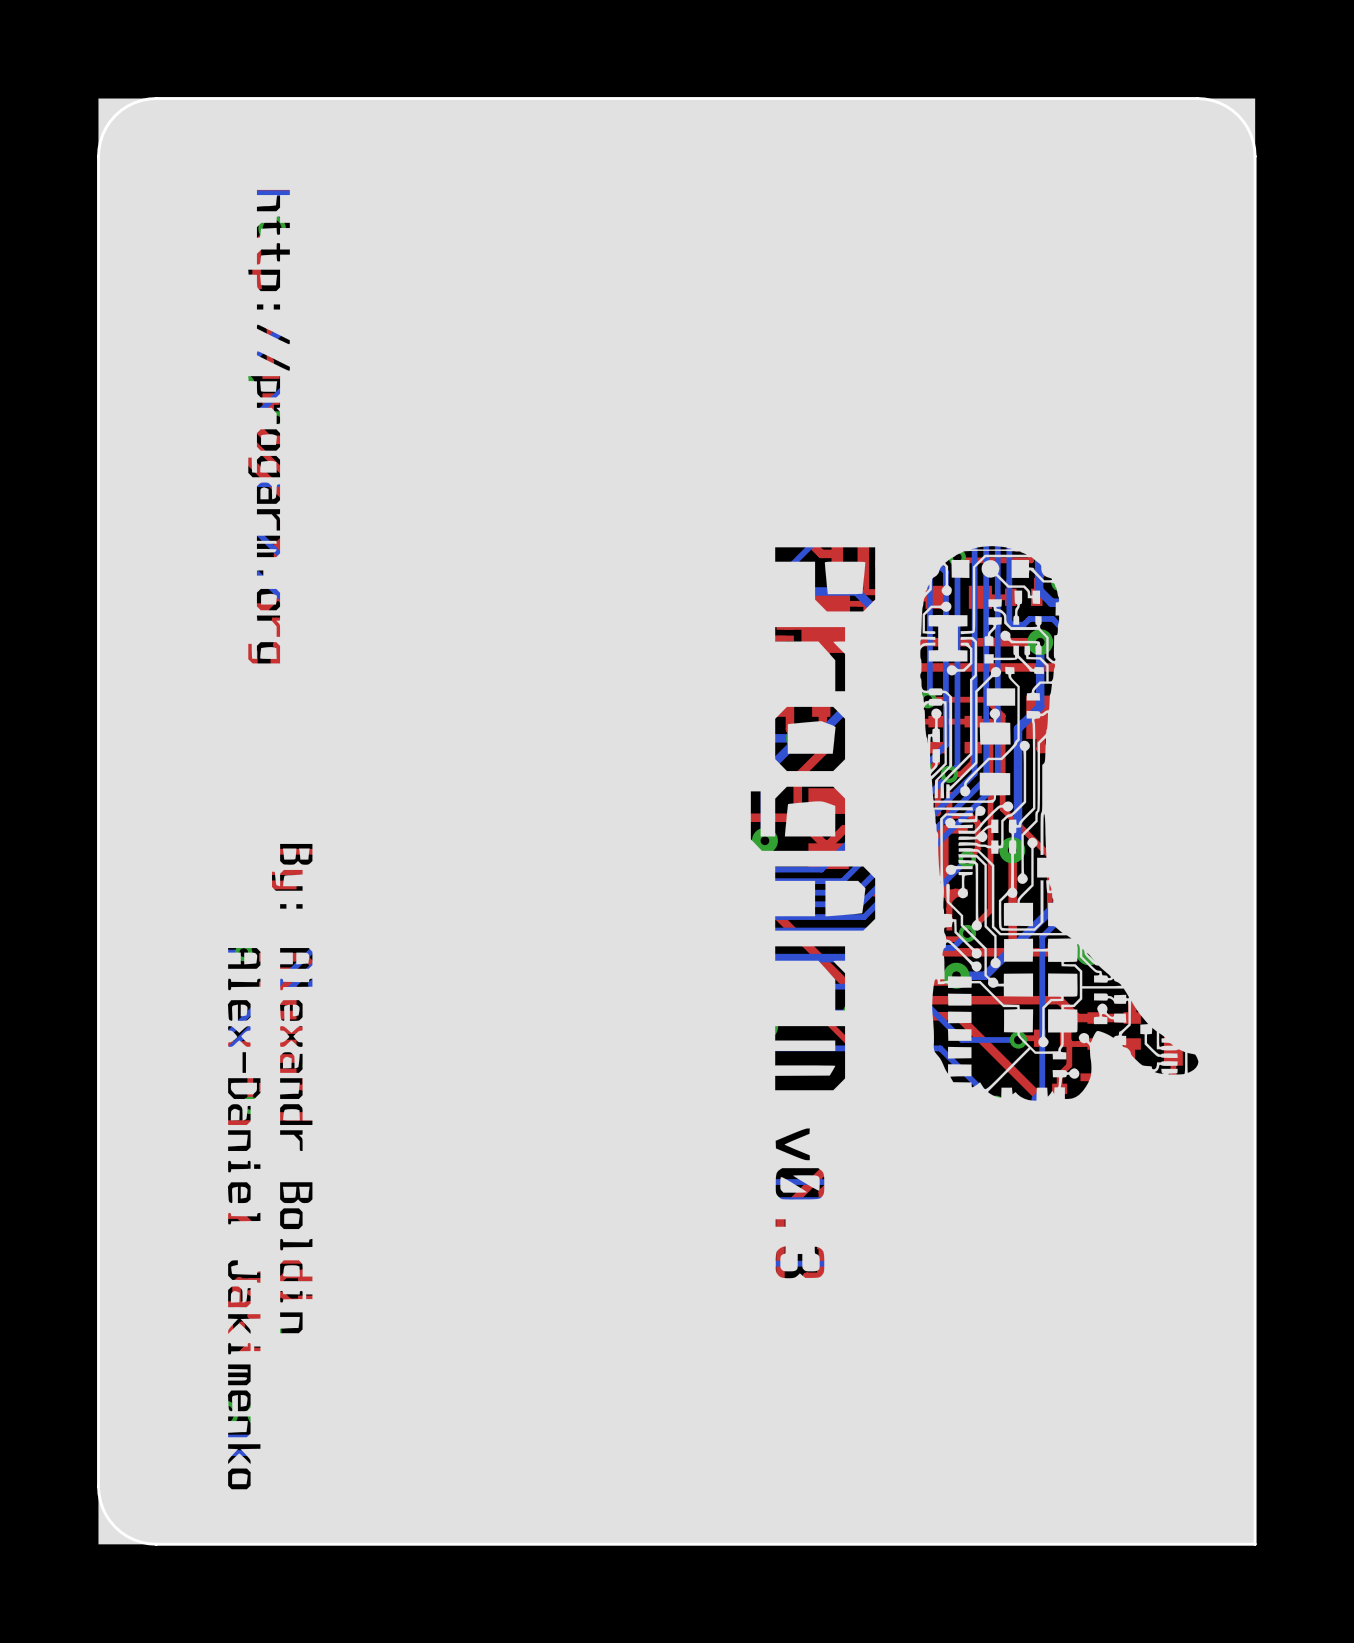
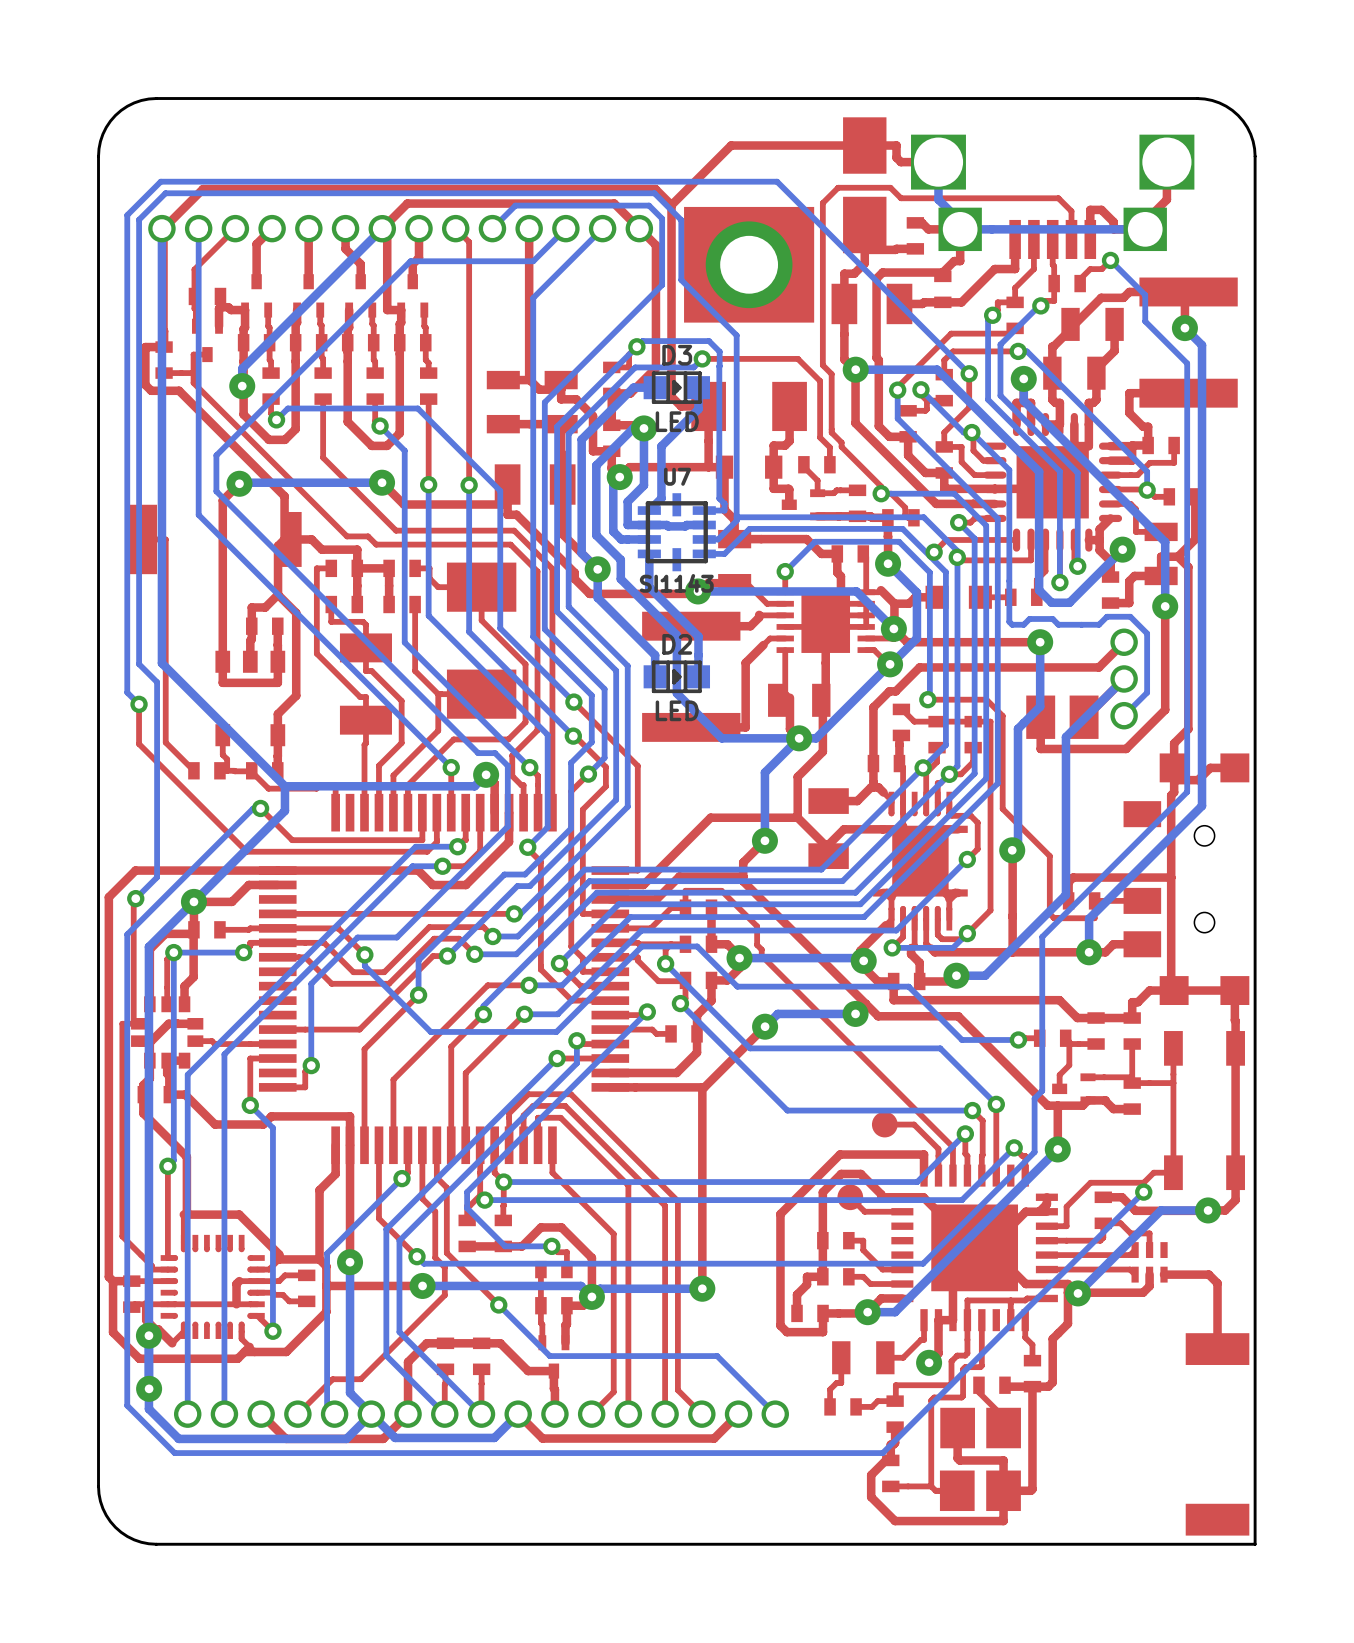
drawing: [98, 98, 1256, 1545] -> none

